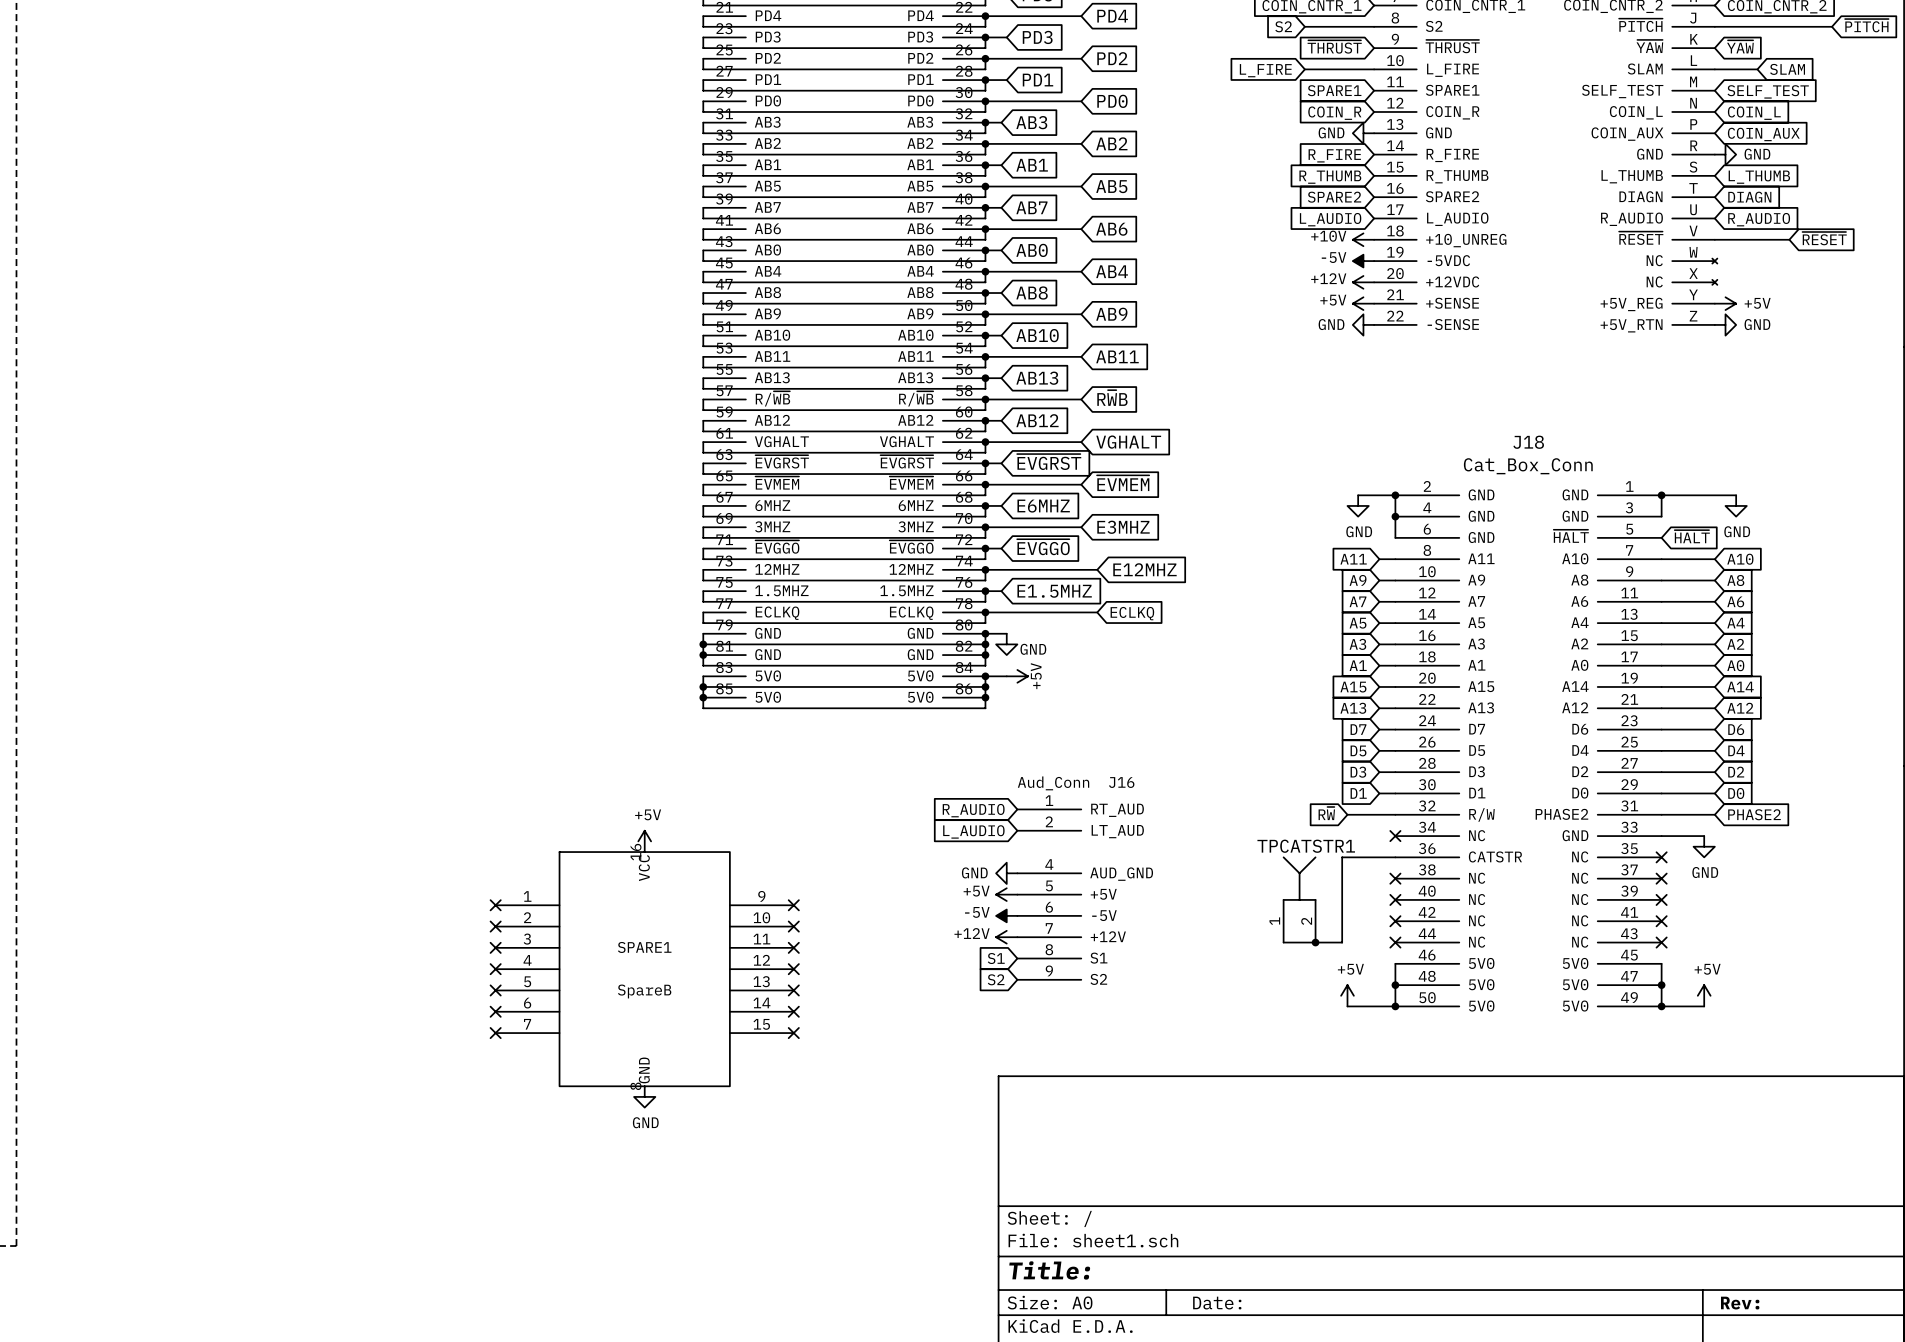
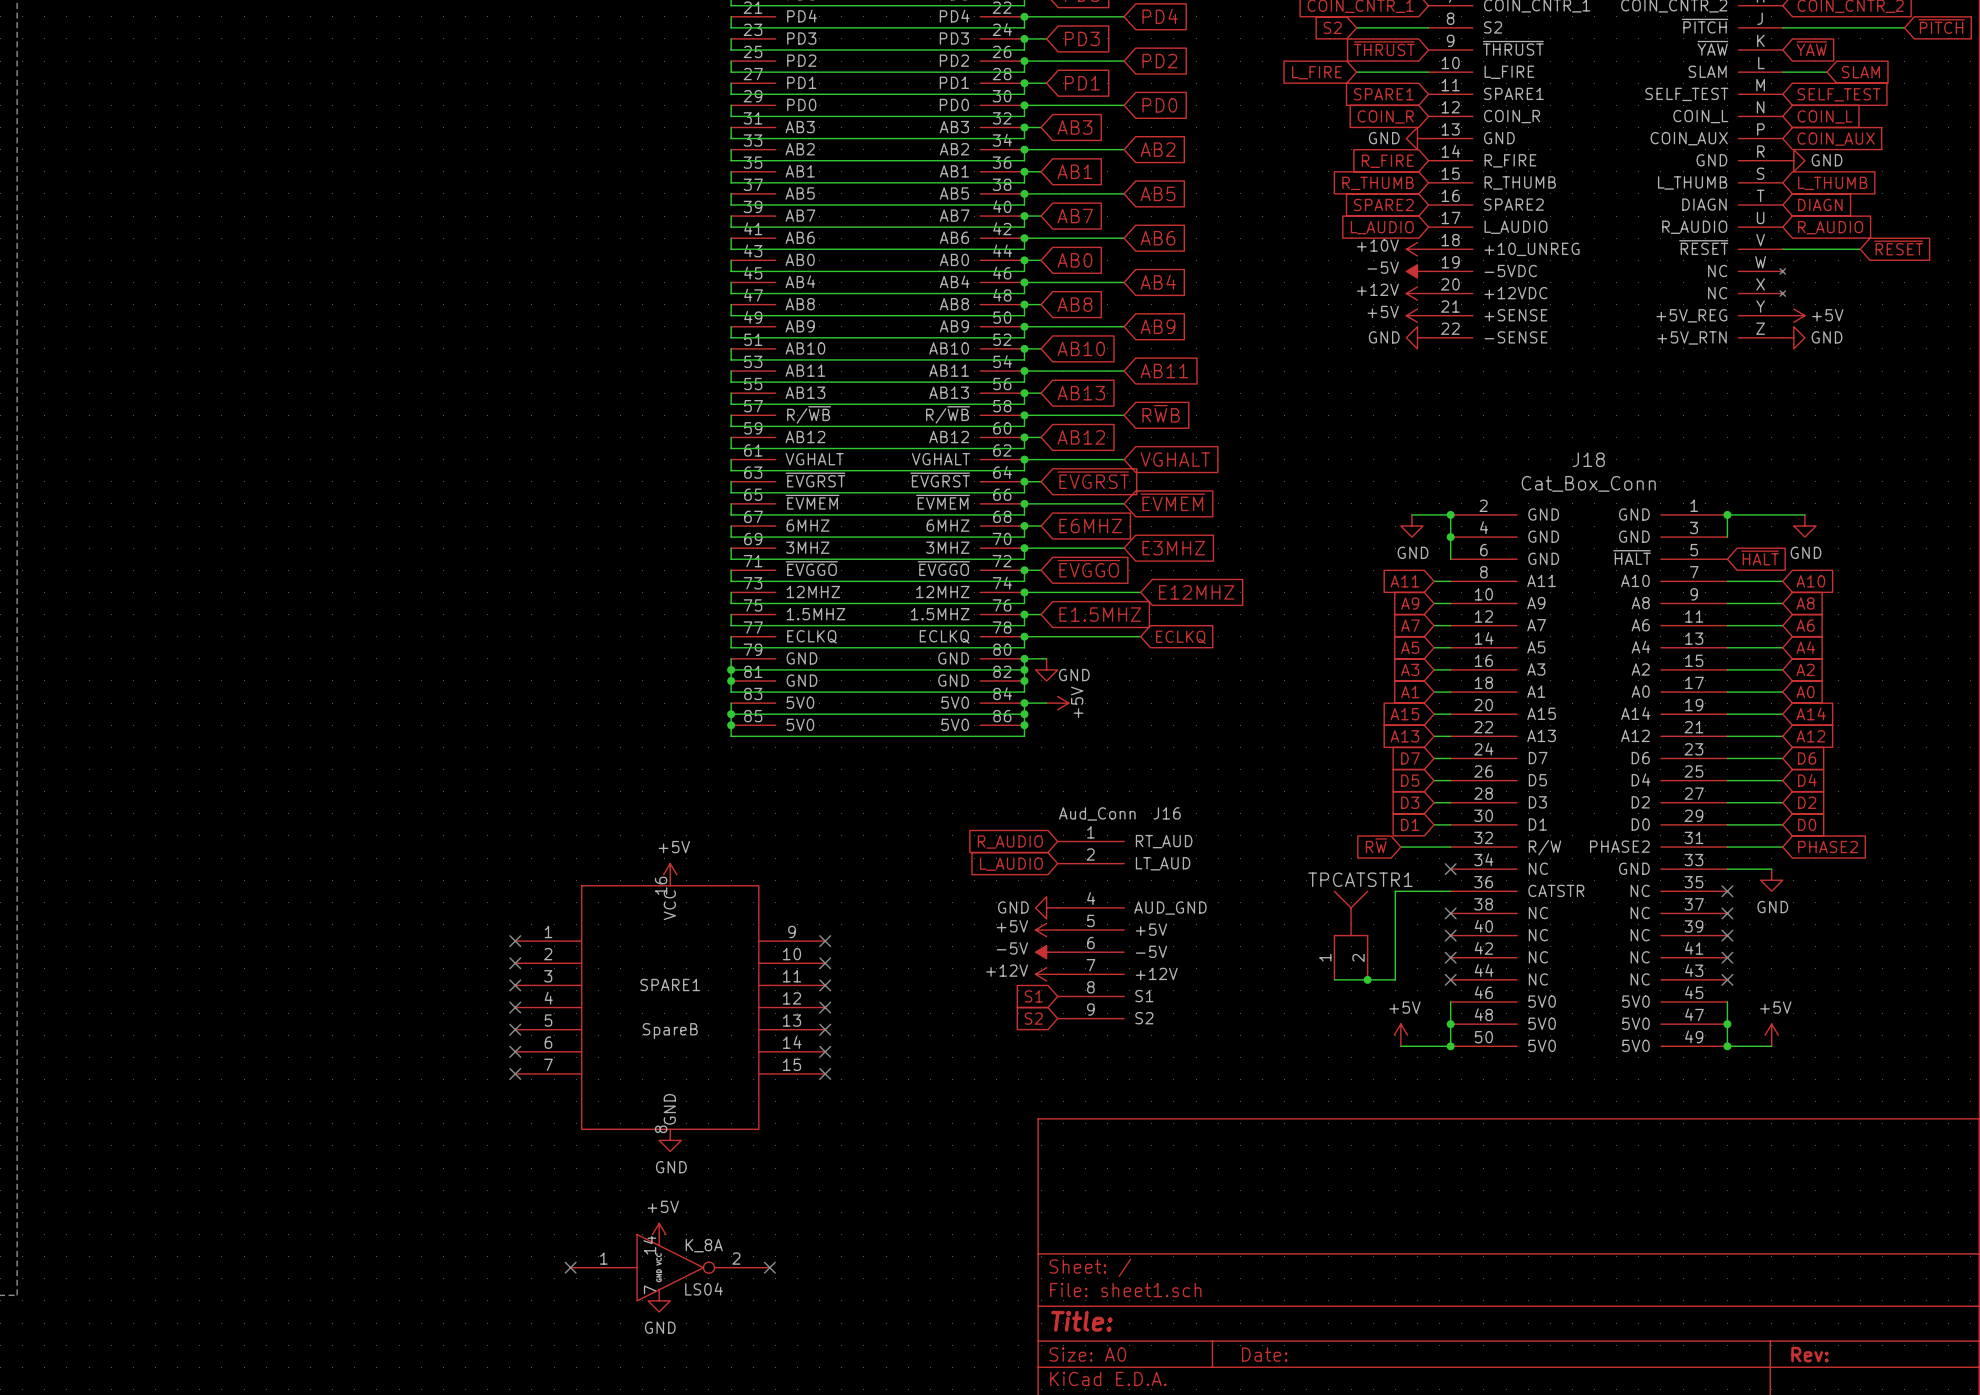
power symbol: none -> +5V (659, 1234)
no-connect mark: none -> (570, 1267)
K_8A: none -> LS04 (670, 1267)
no-connect mark: none -> (769, 1267)
power symbol: none -> GND (659, 1300)

